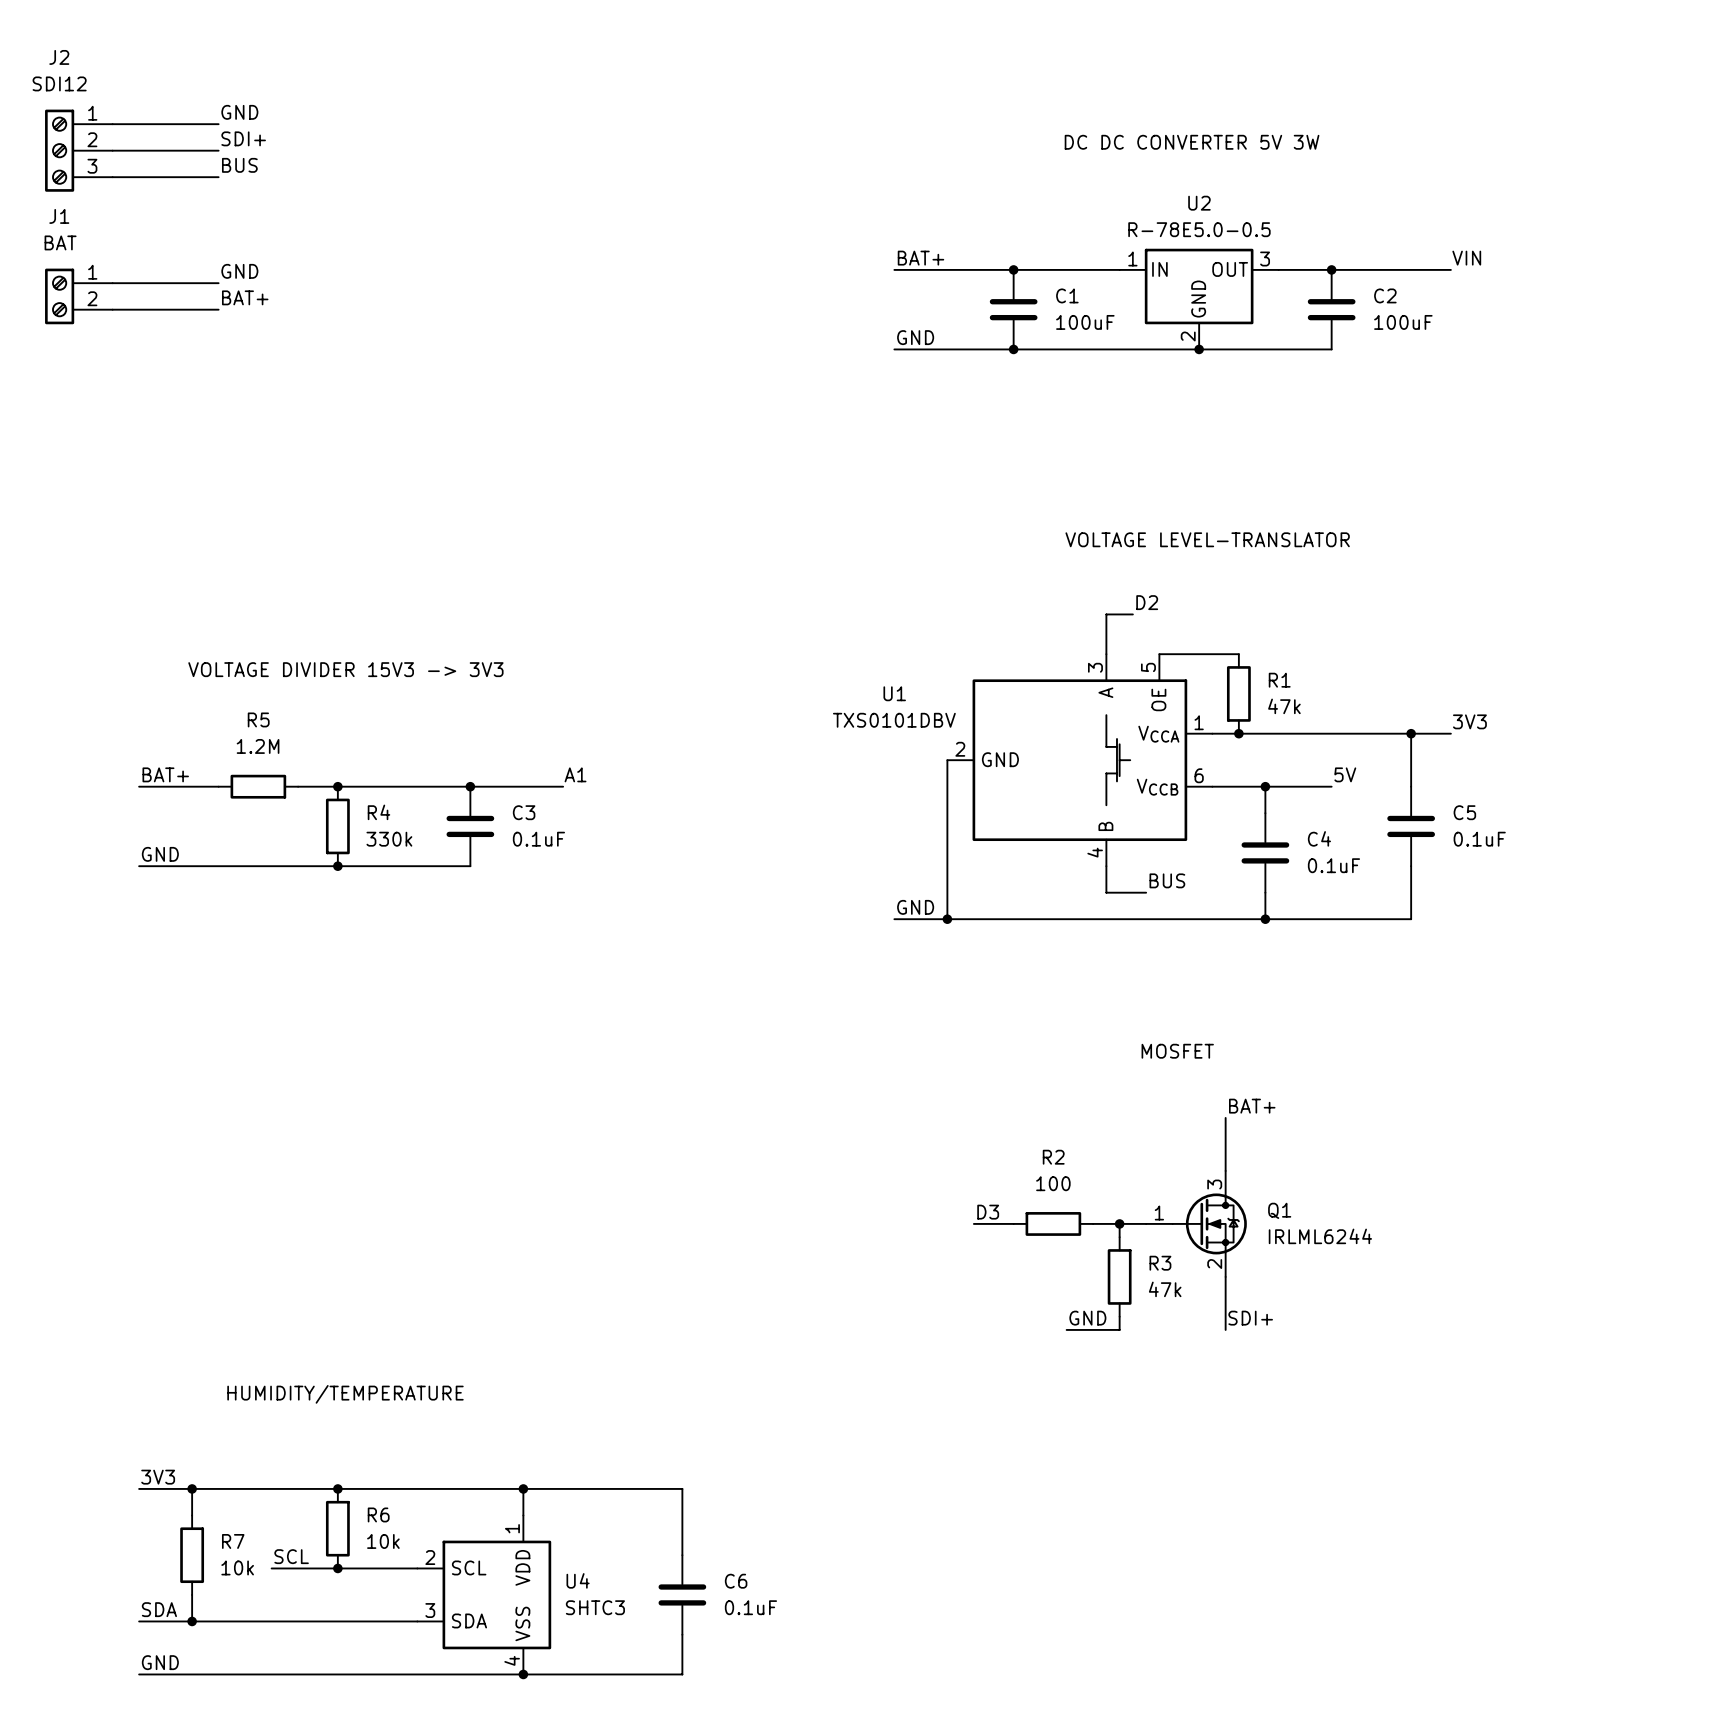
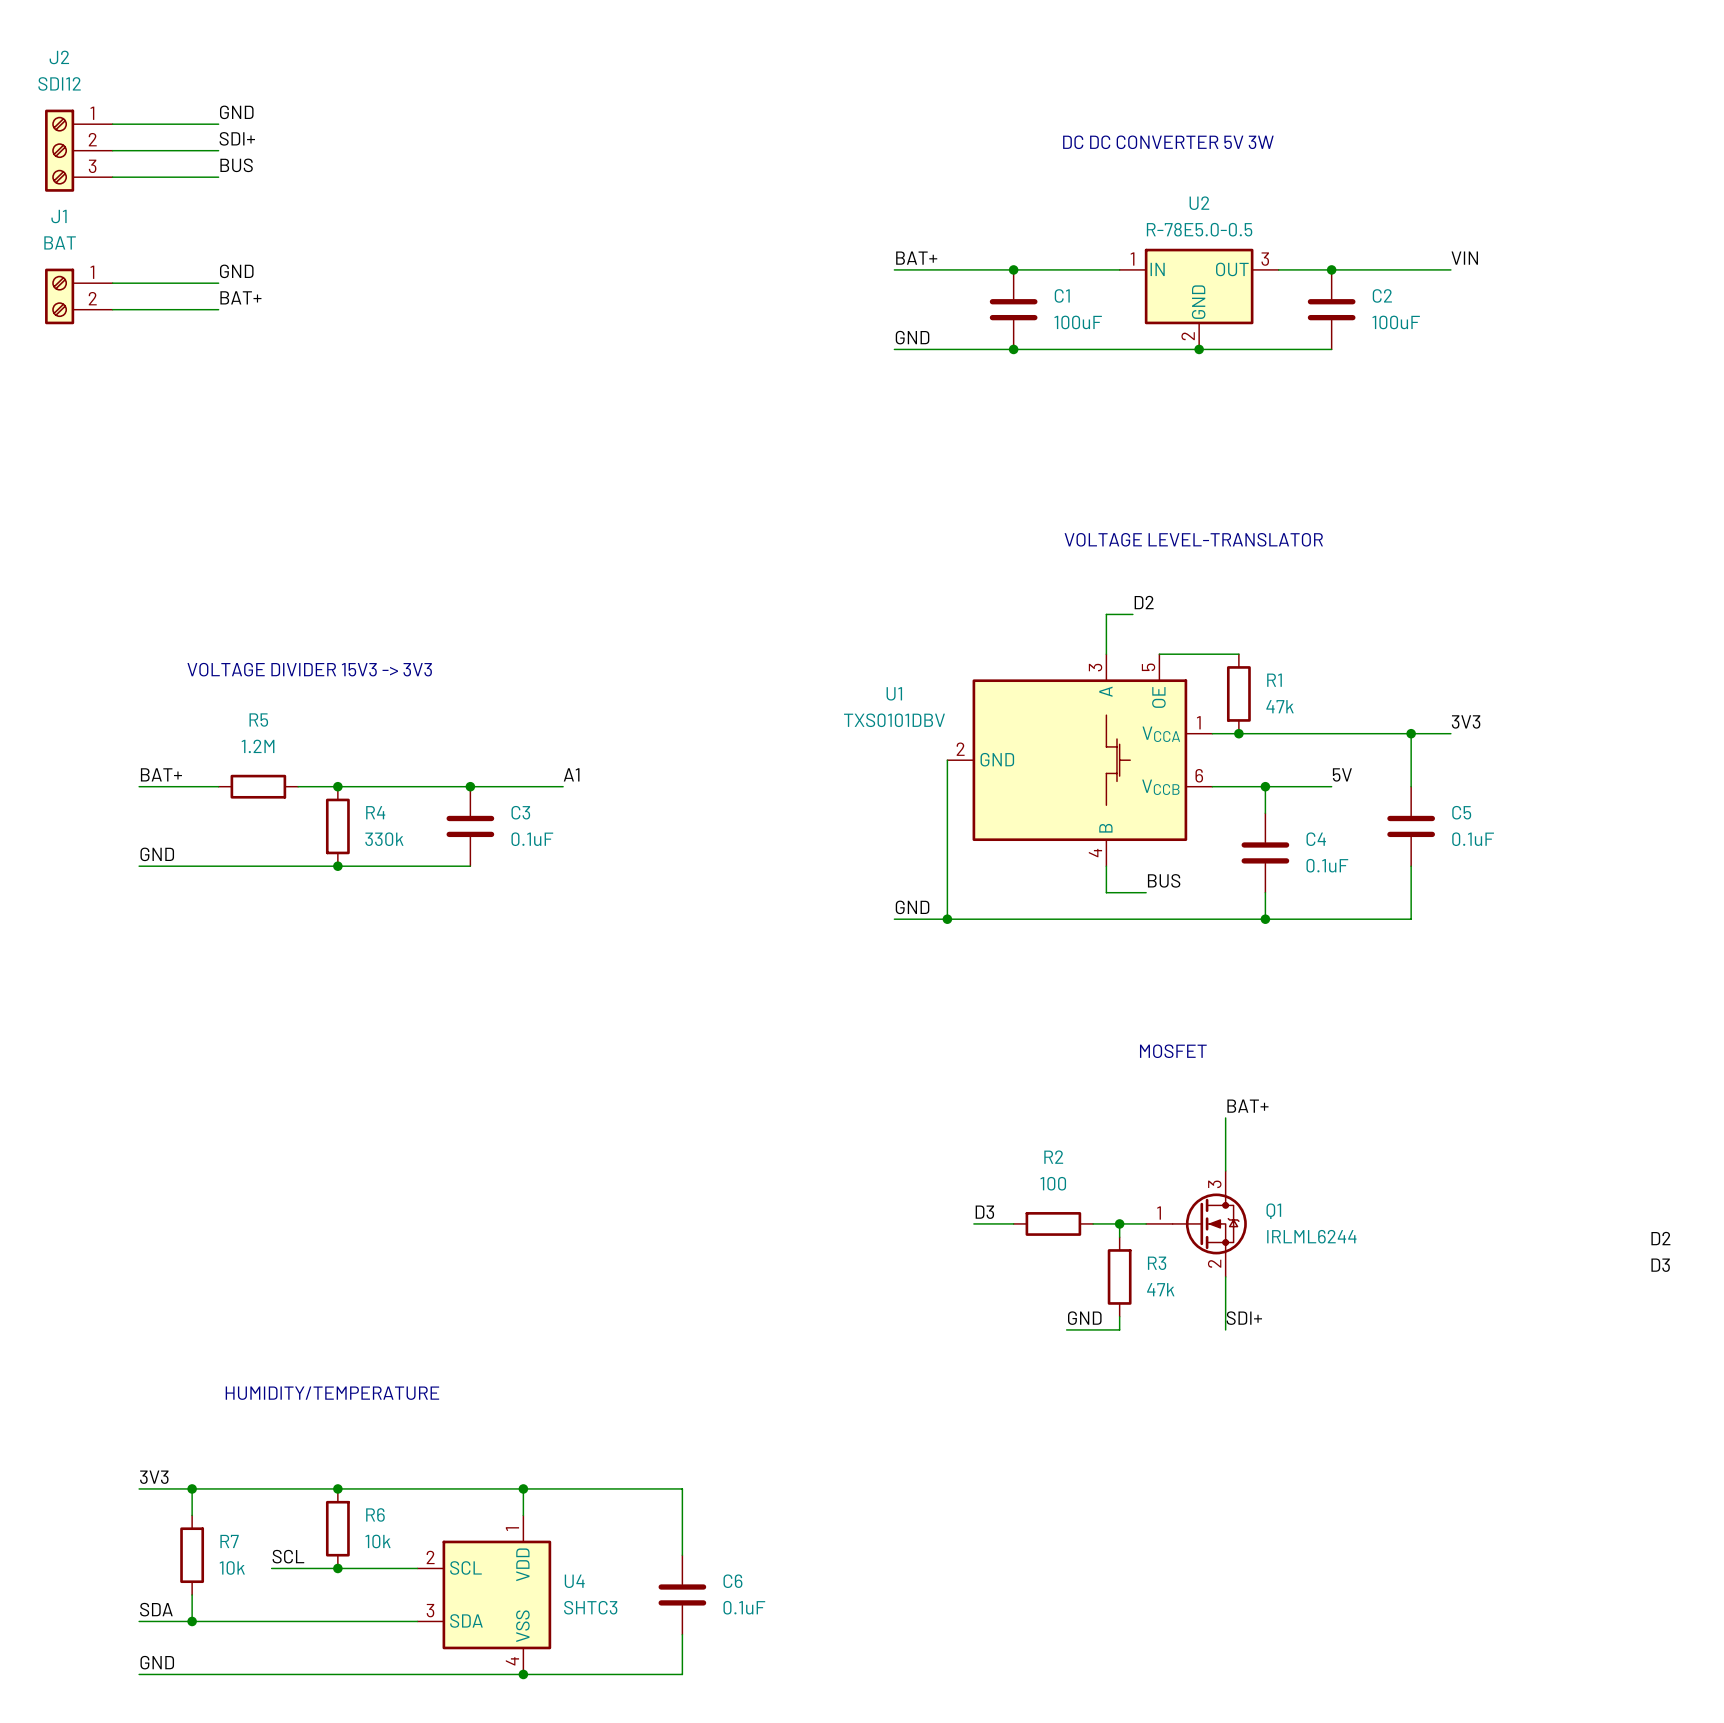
label: none -> D2 (1660, 1238)
label: none -> D3 (1660, 1265)

